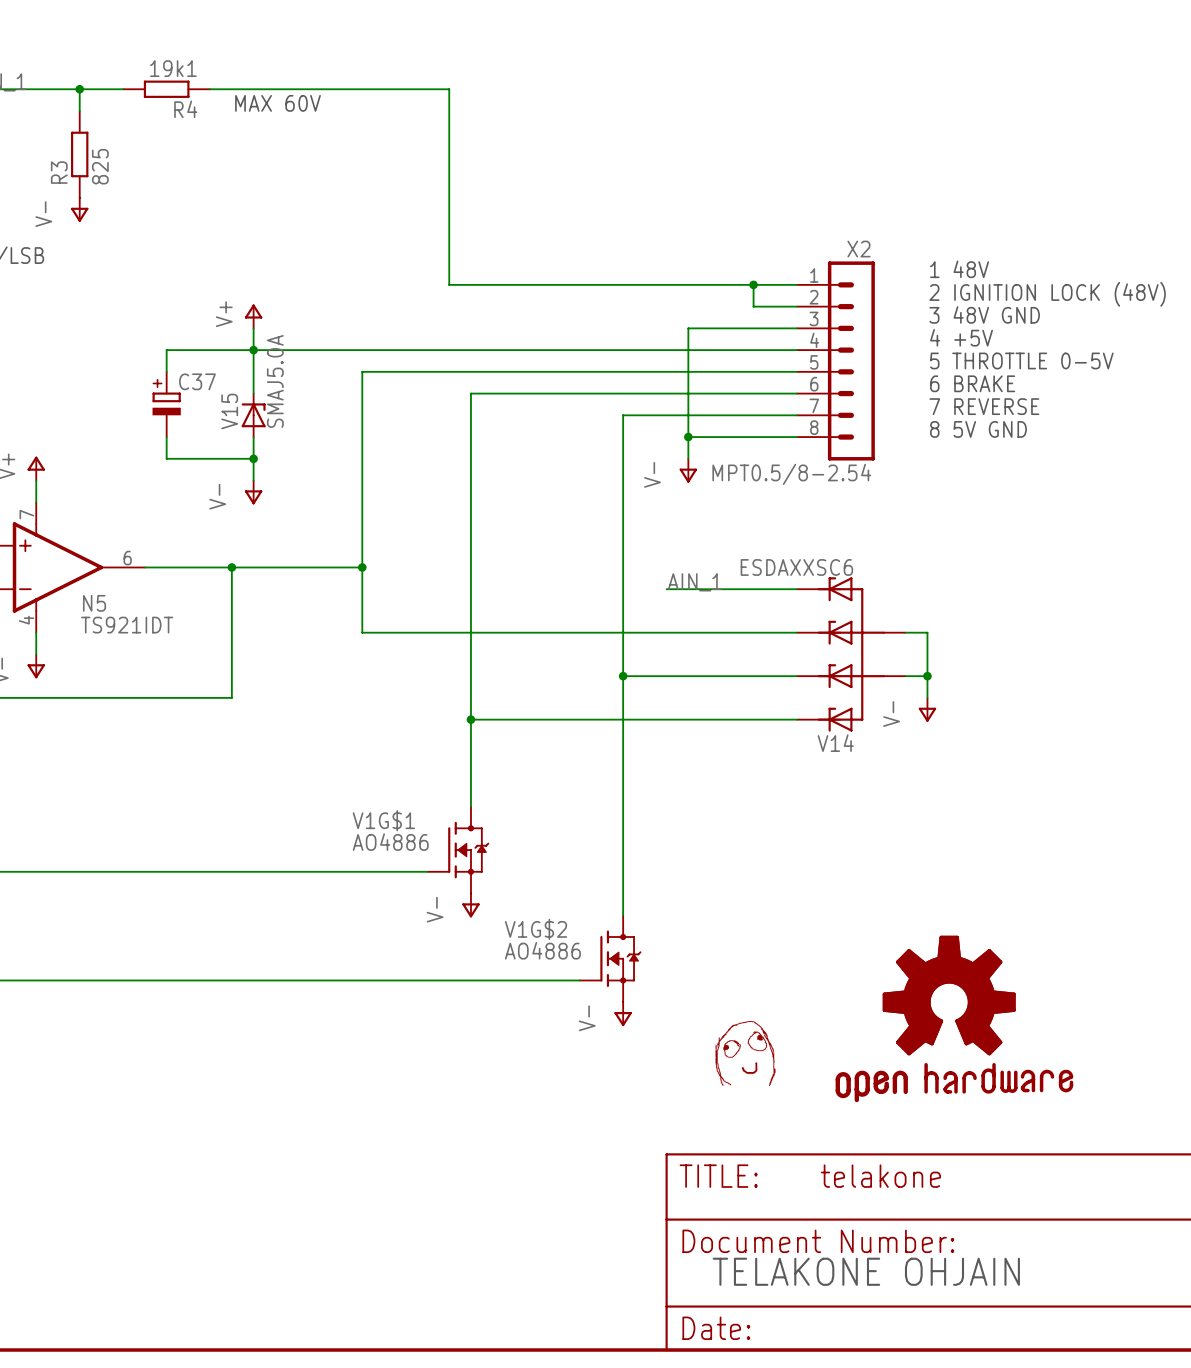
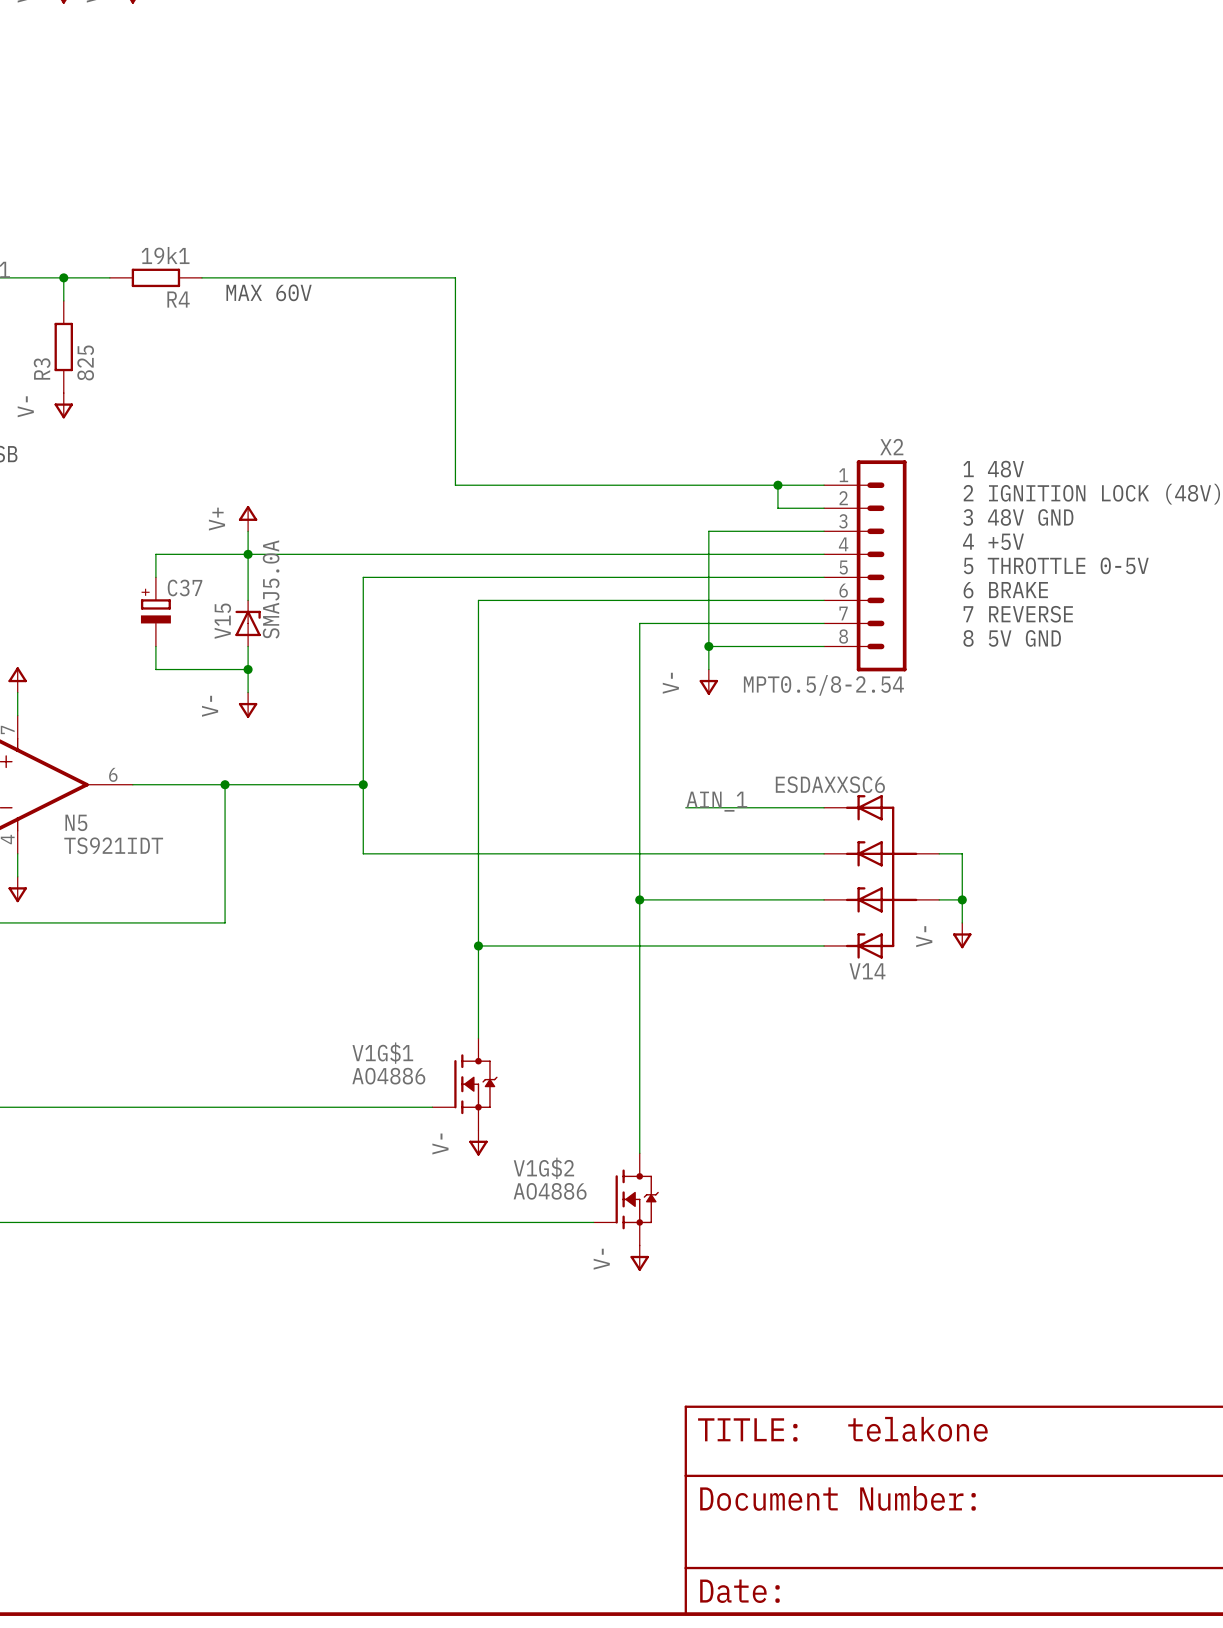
part: (954, 1018) -> none
part: (745, 1053) -> none
text: TELAKONE OHJAIN (866, 1271) -> none

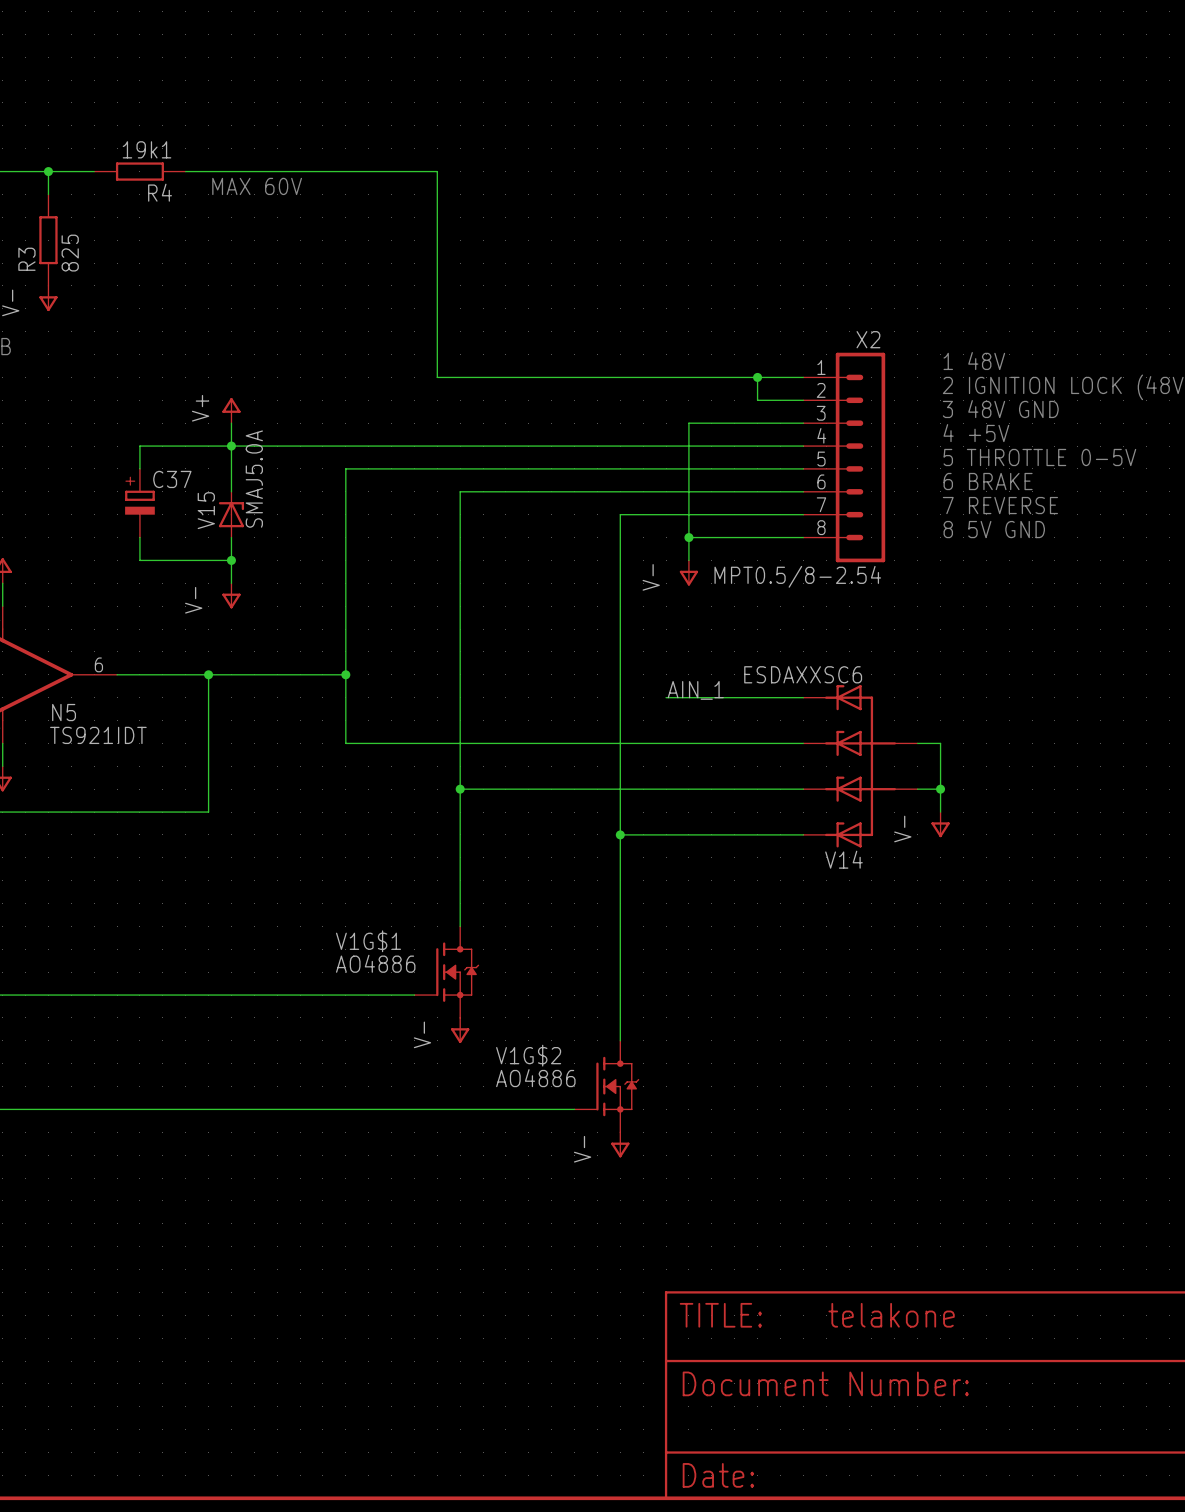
junction position: (639, 899) -> (620, 834)
wire: (478, 945) (639, 945) -> (460, 789) (620, 789)
junction position: (478, 945) -> (460, 789)

